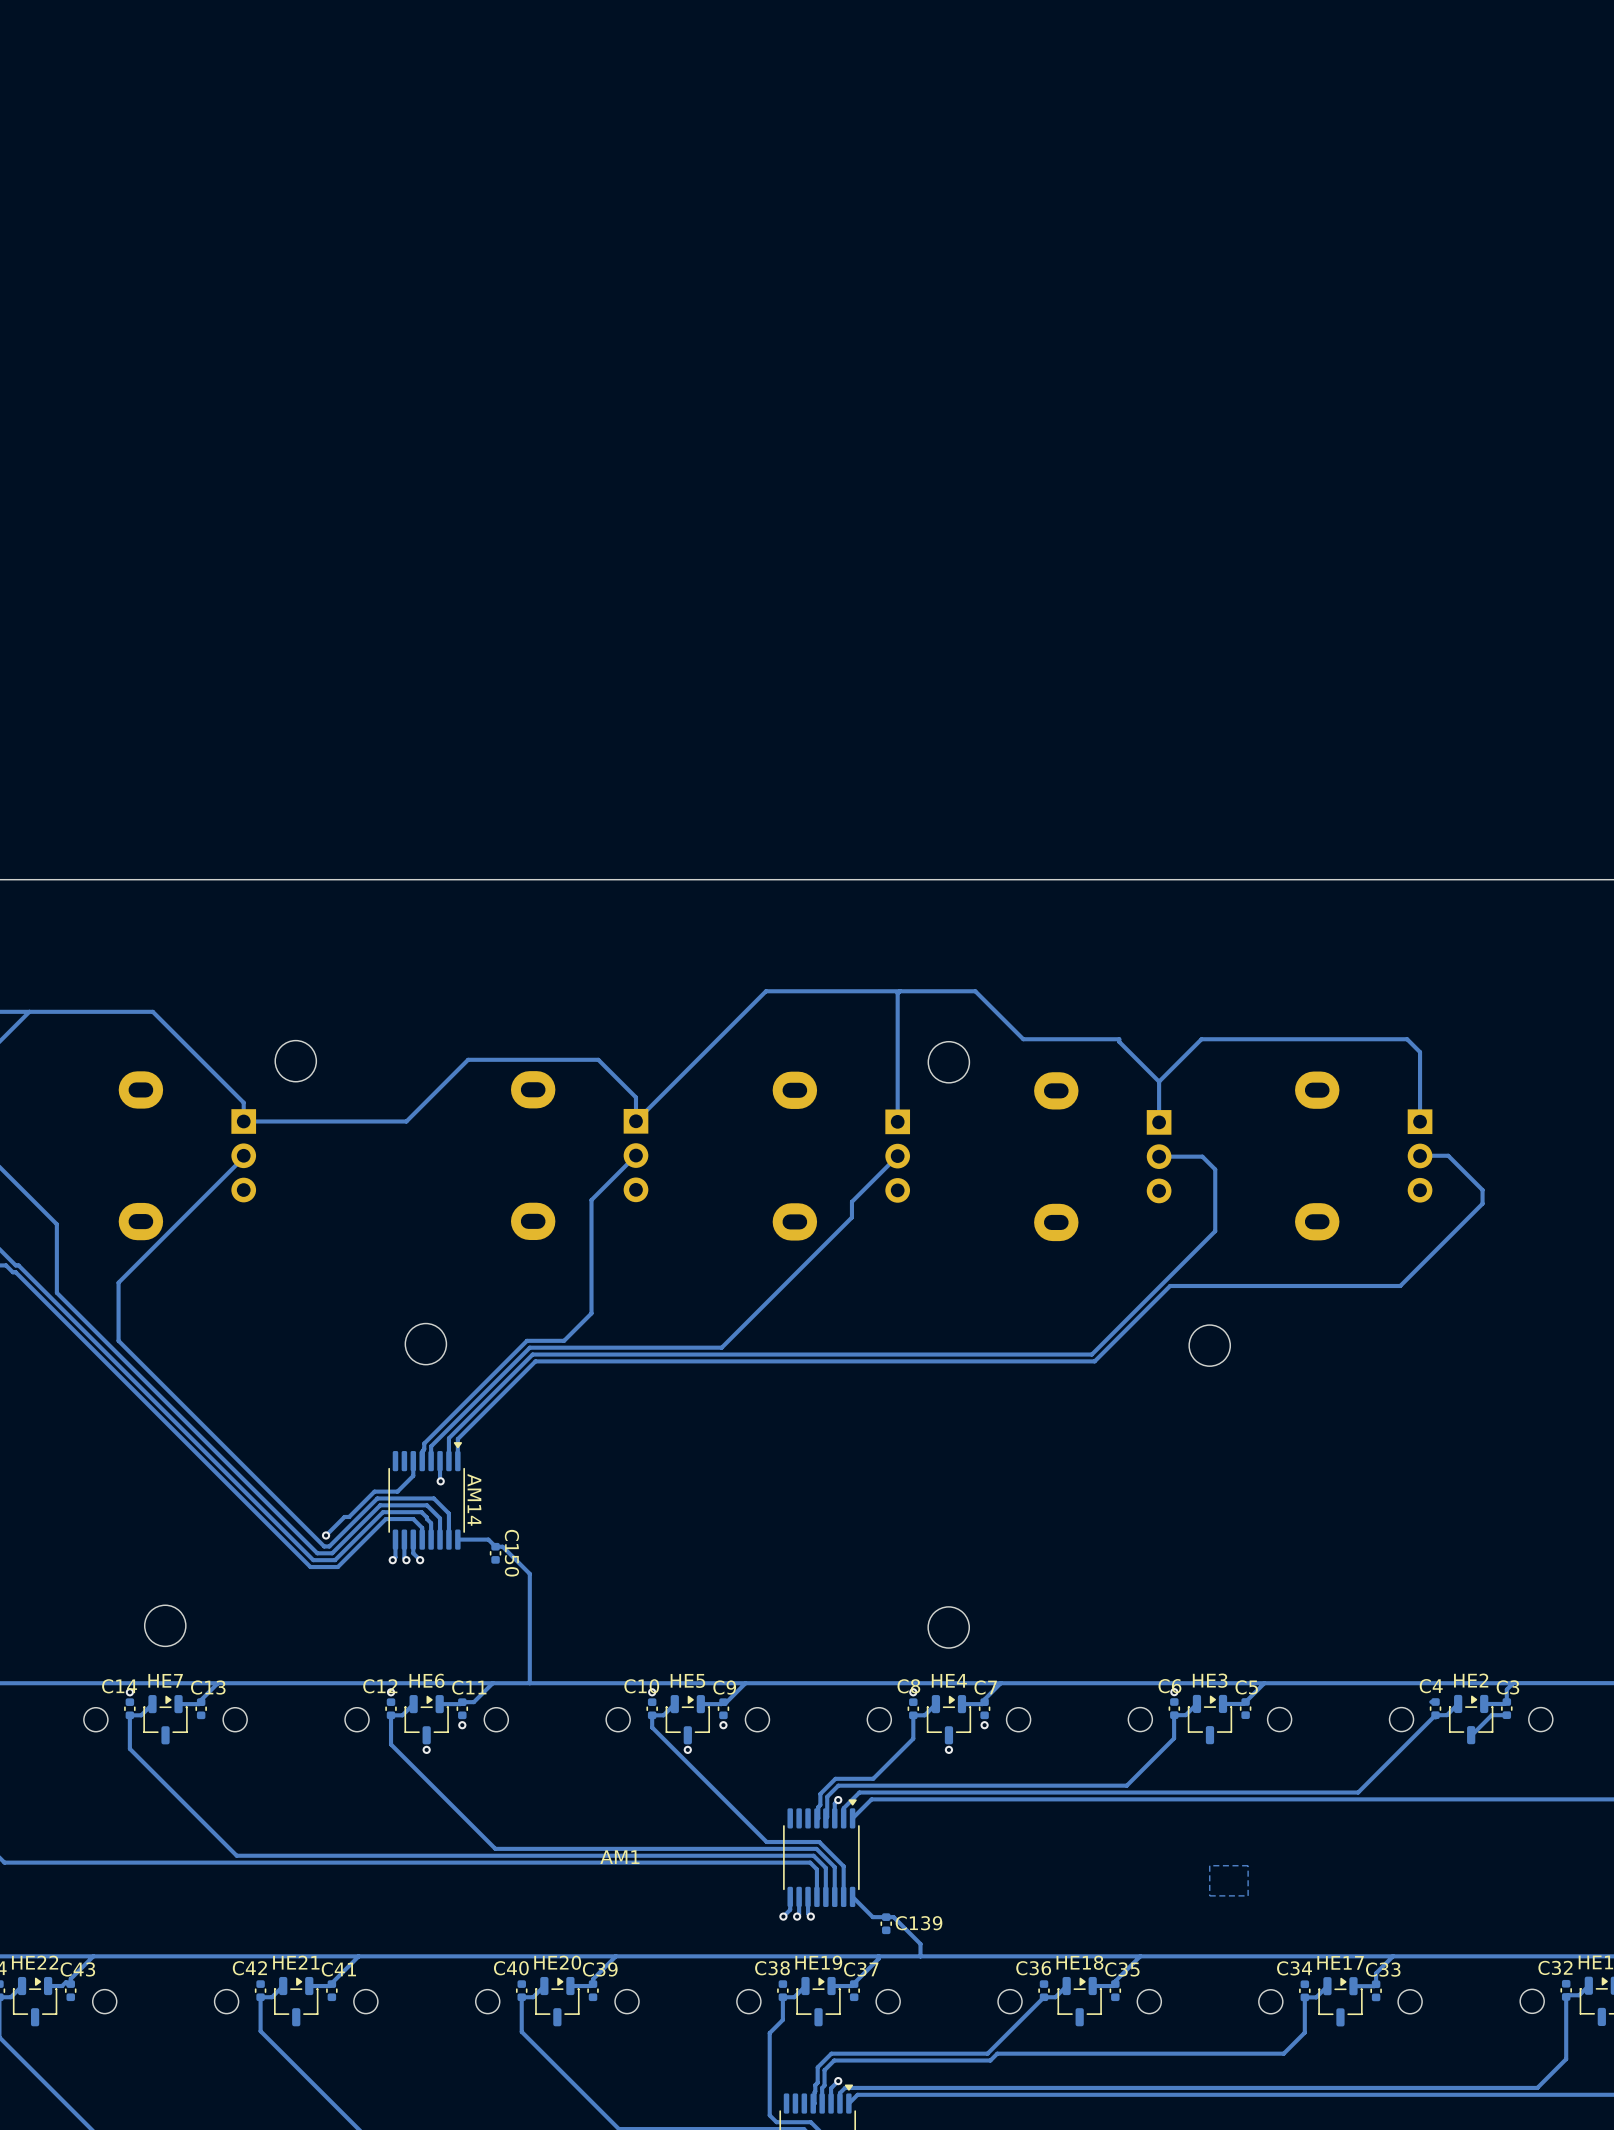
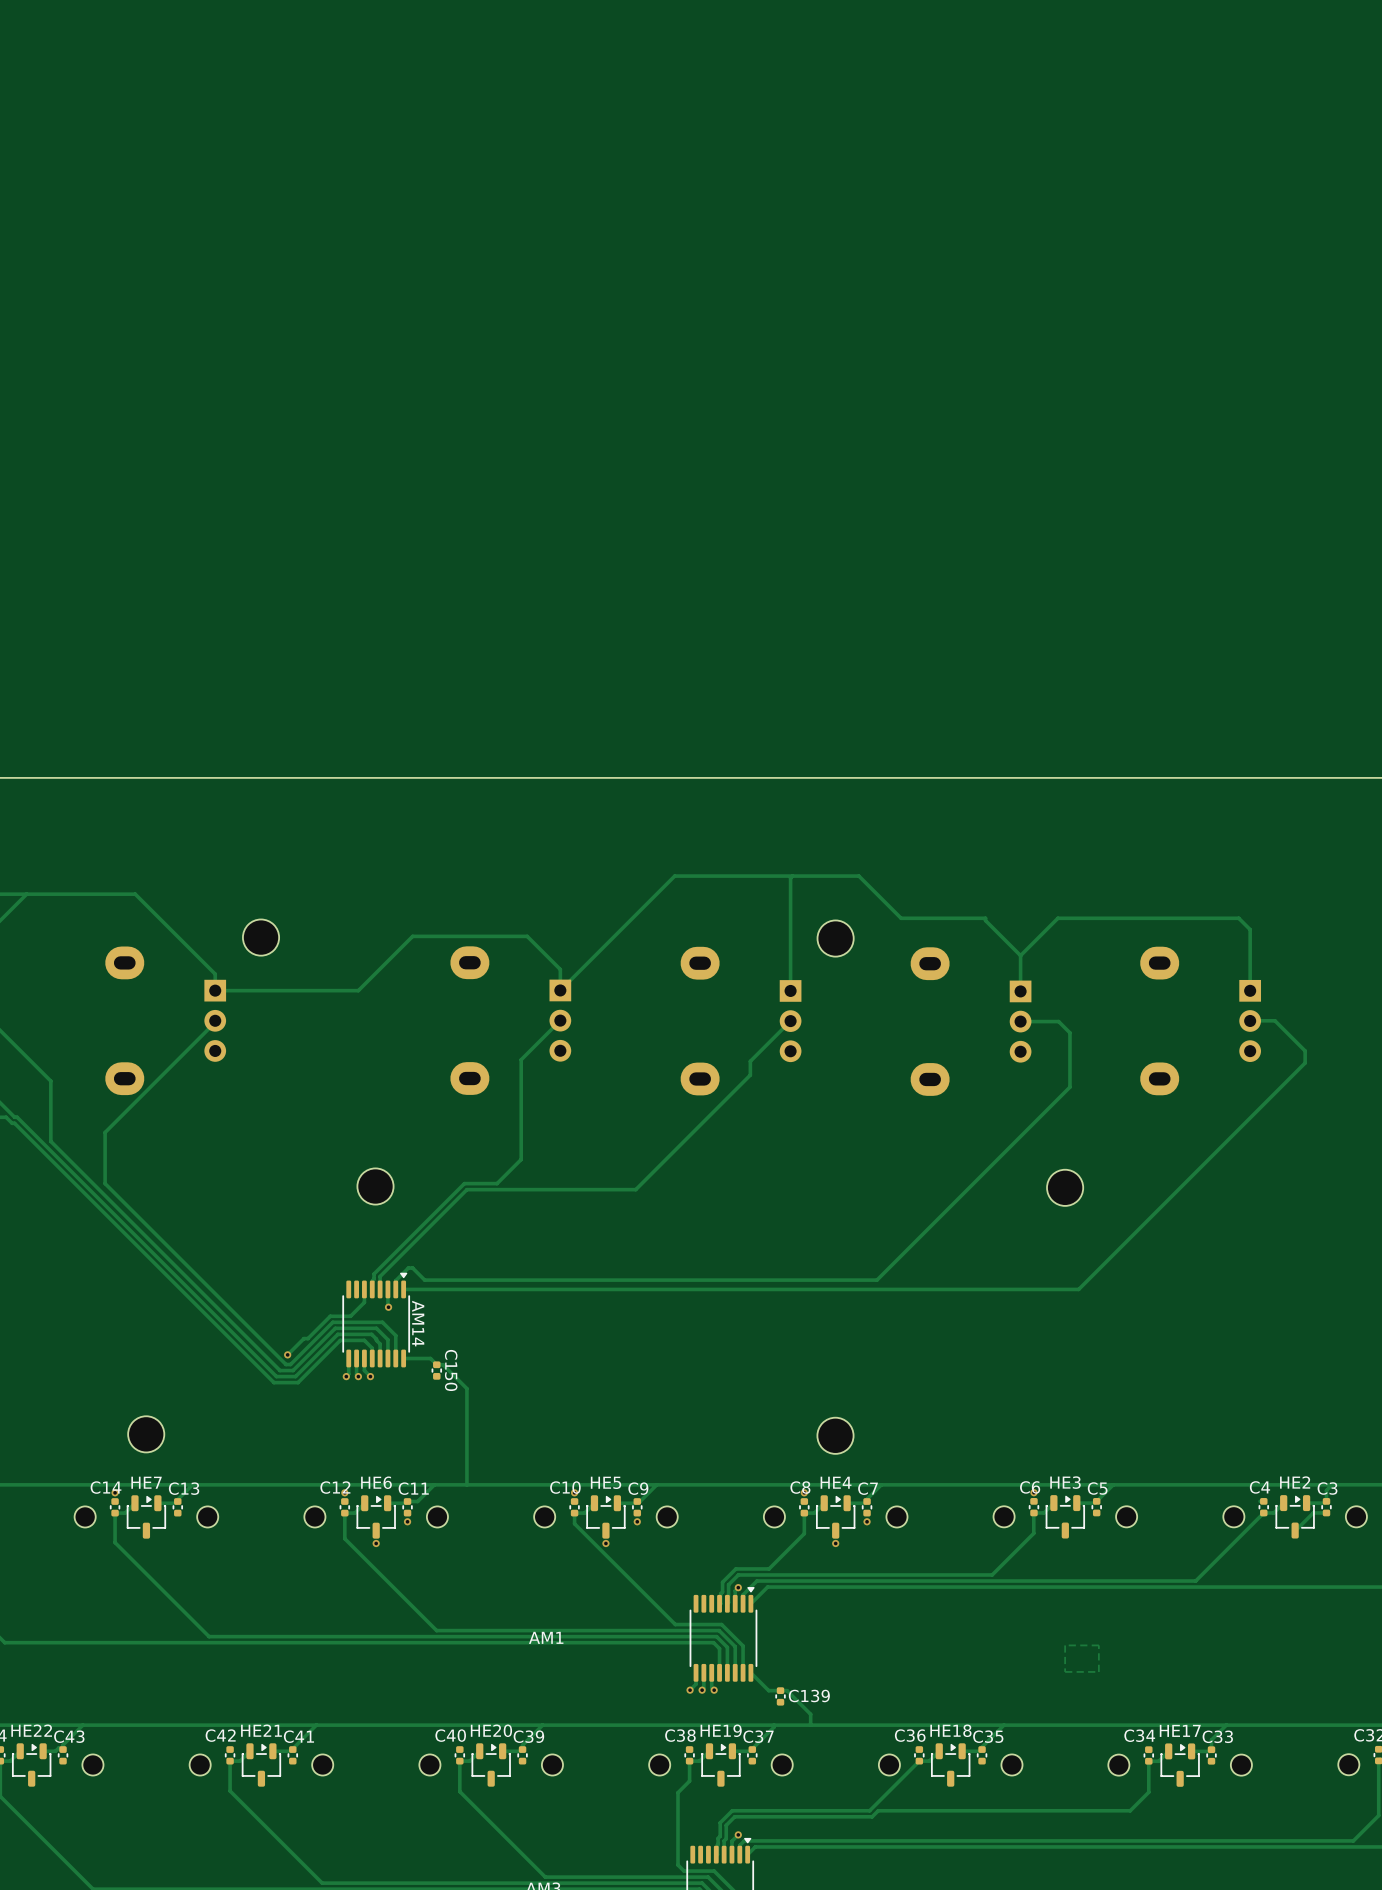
track: (1400, 1286) (1170, 1286) (1094, 1361) (535, 1361) (457, 1439) (457, 1461) -> (1232, 1135) (1078, 1289) (403, 1289)
track: (1091, 1354) (532, 1354) (448, 1438) (448, 1451) -> (961, 1195) (877, 1280) (424, 1280) (412, 1268) (408, 1268) (395, 1280)

